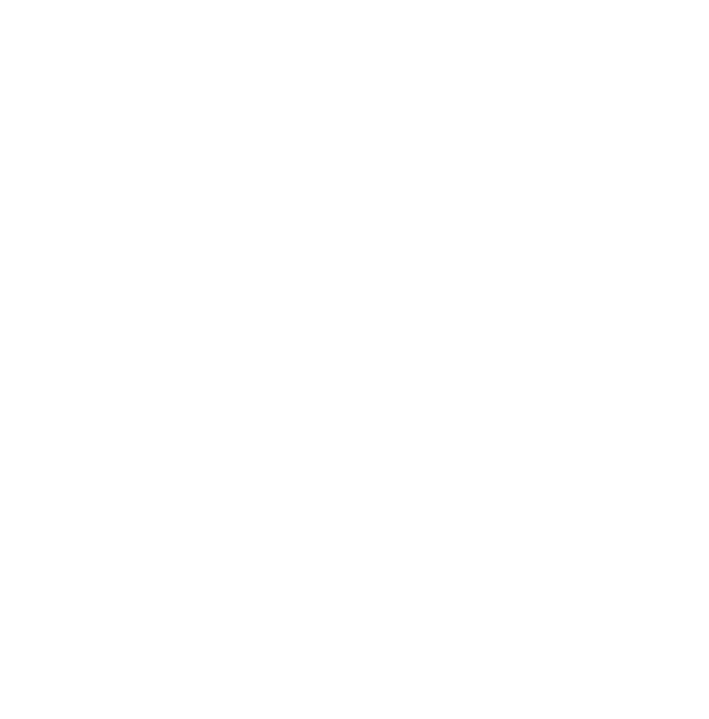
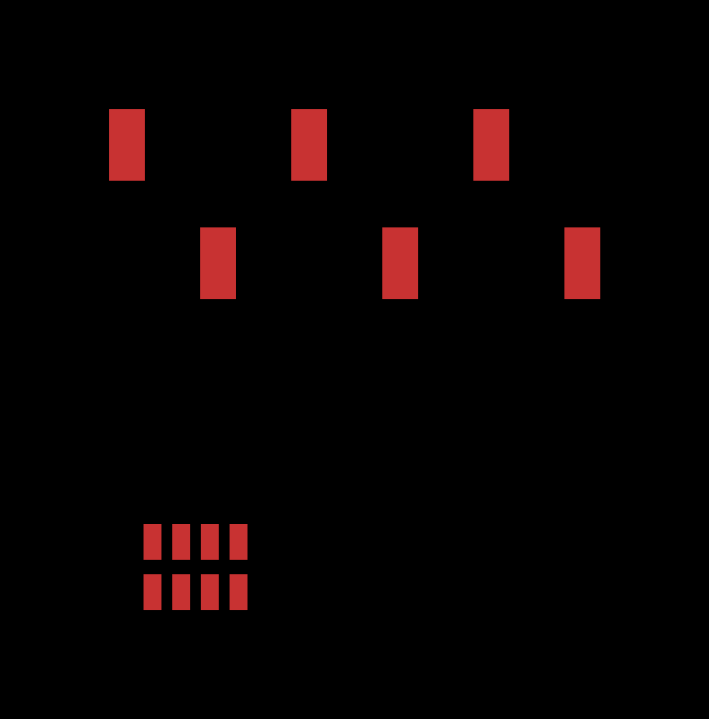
part: none -> (354, 204)
part: none -> (195, 567)

